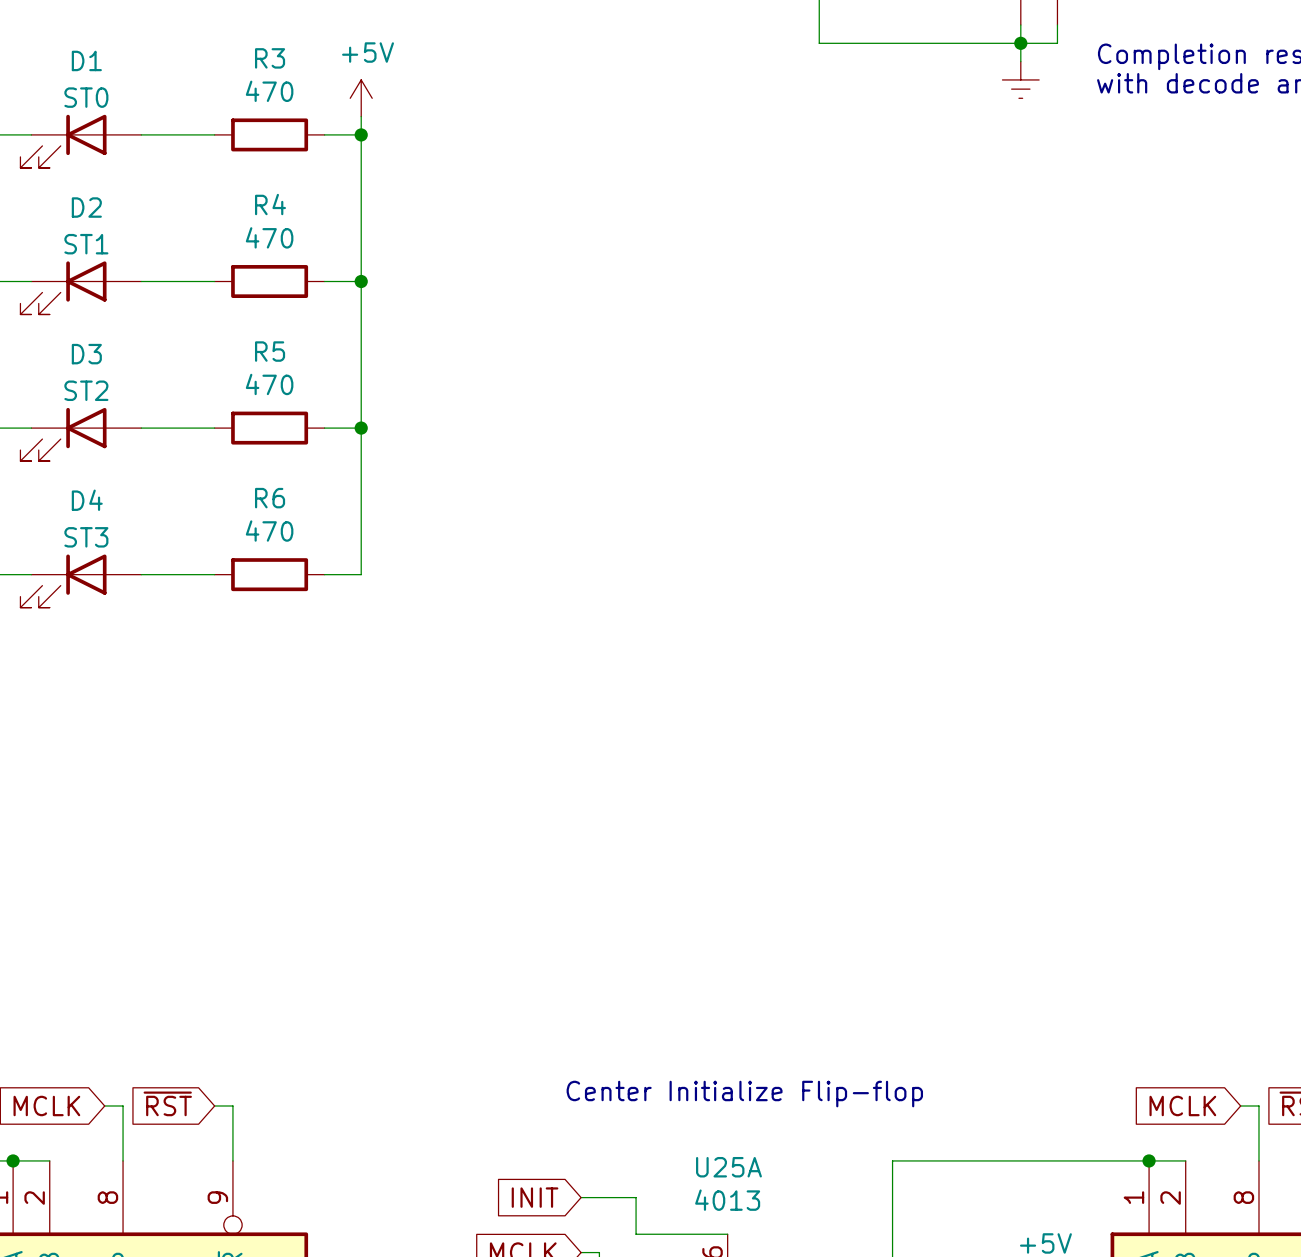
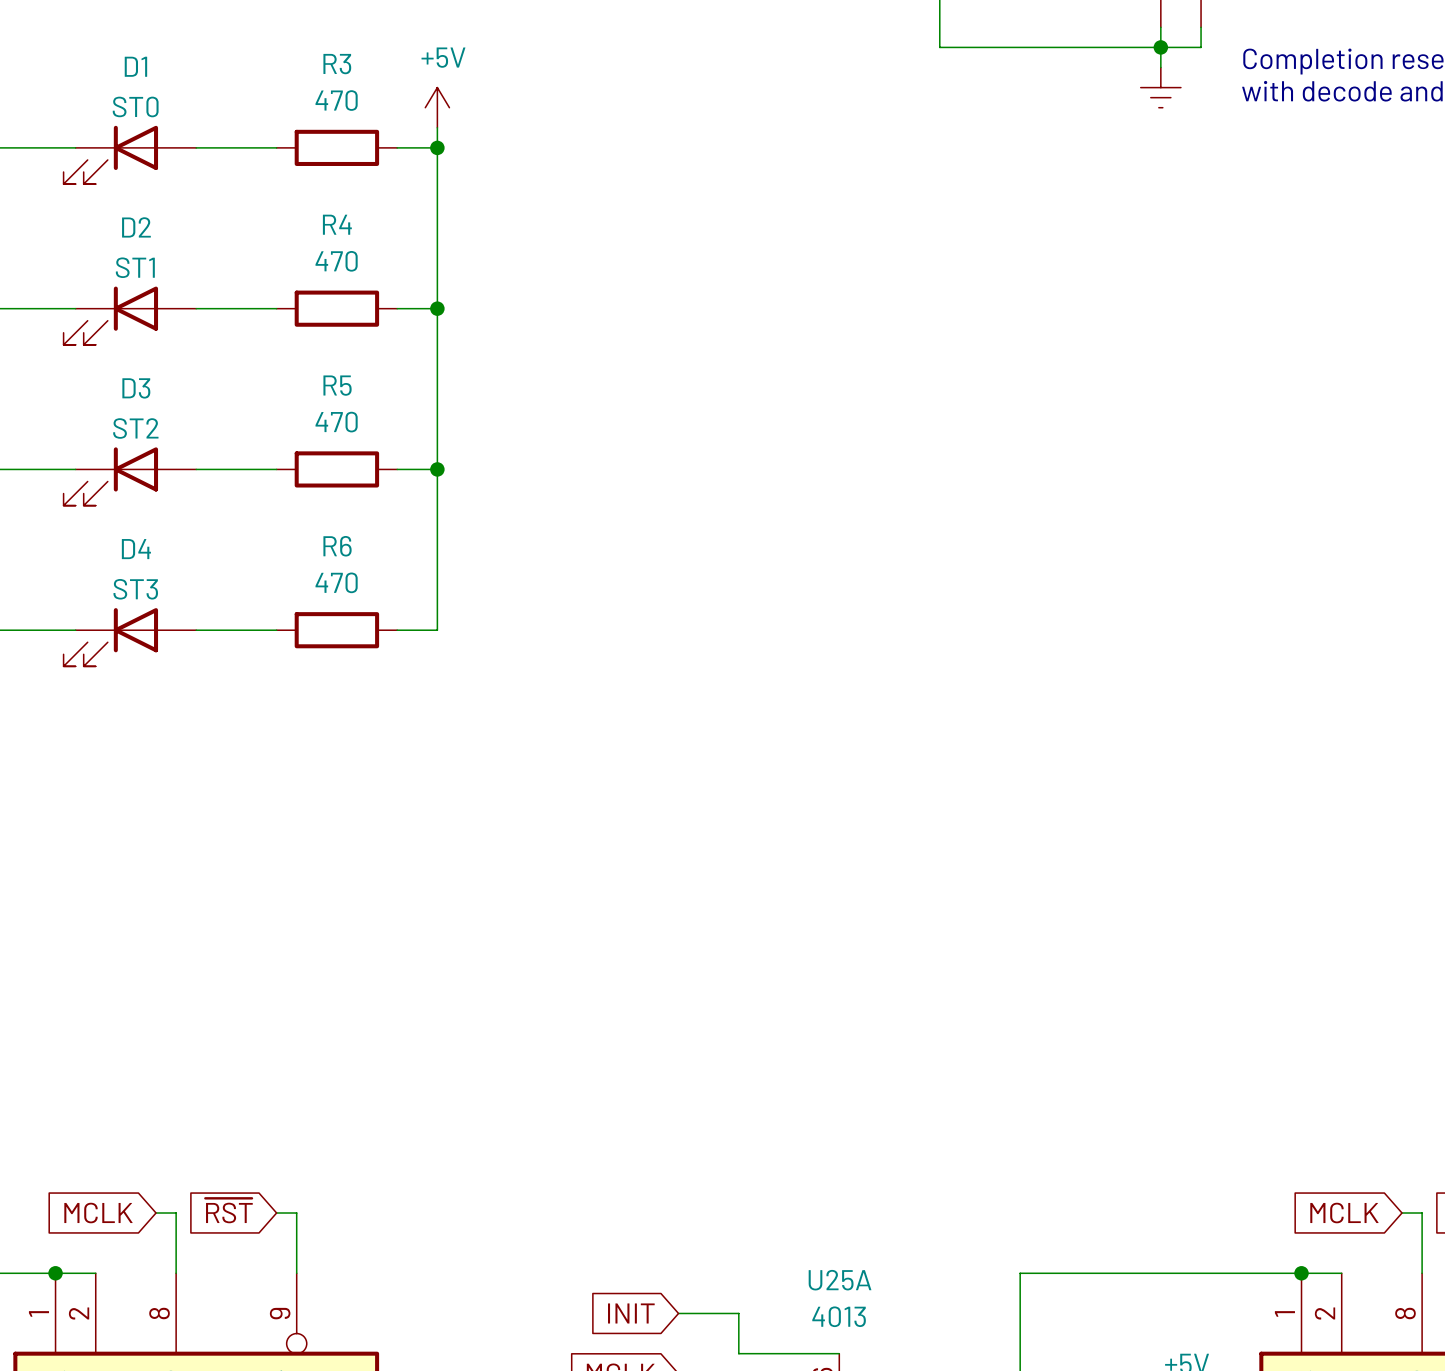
text: Center Initialize Flip-flop (744, 1094) -> none

